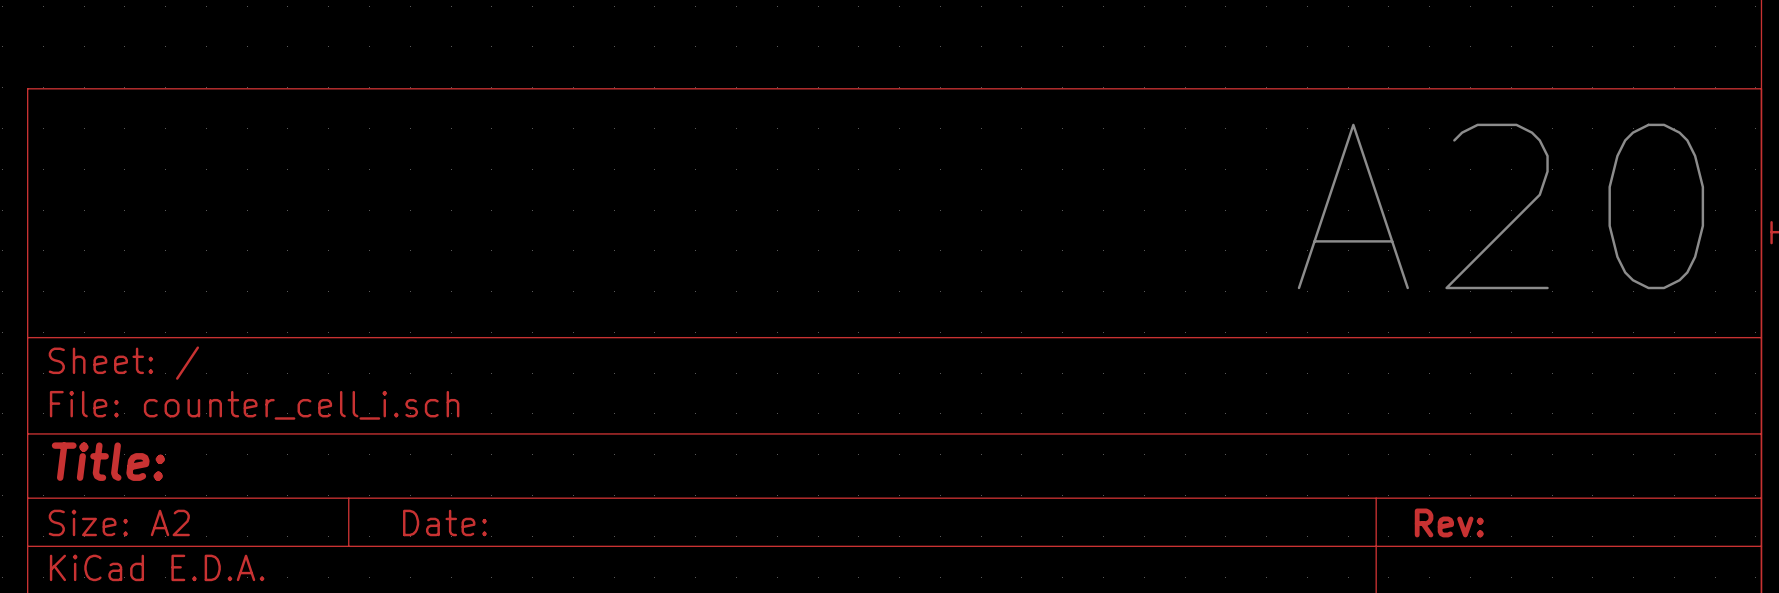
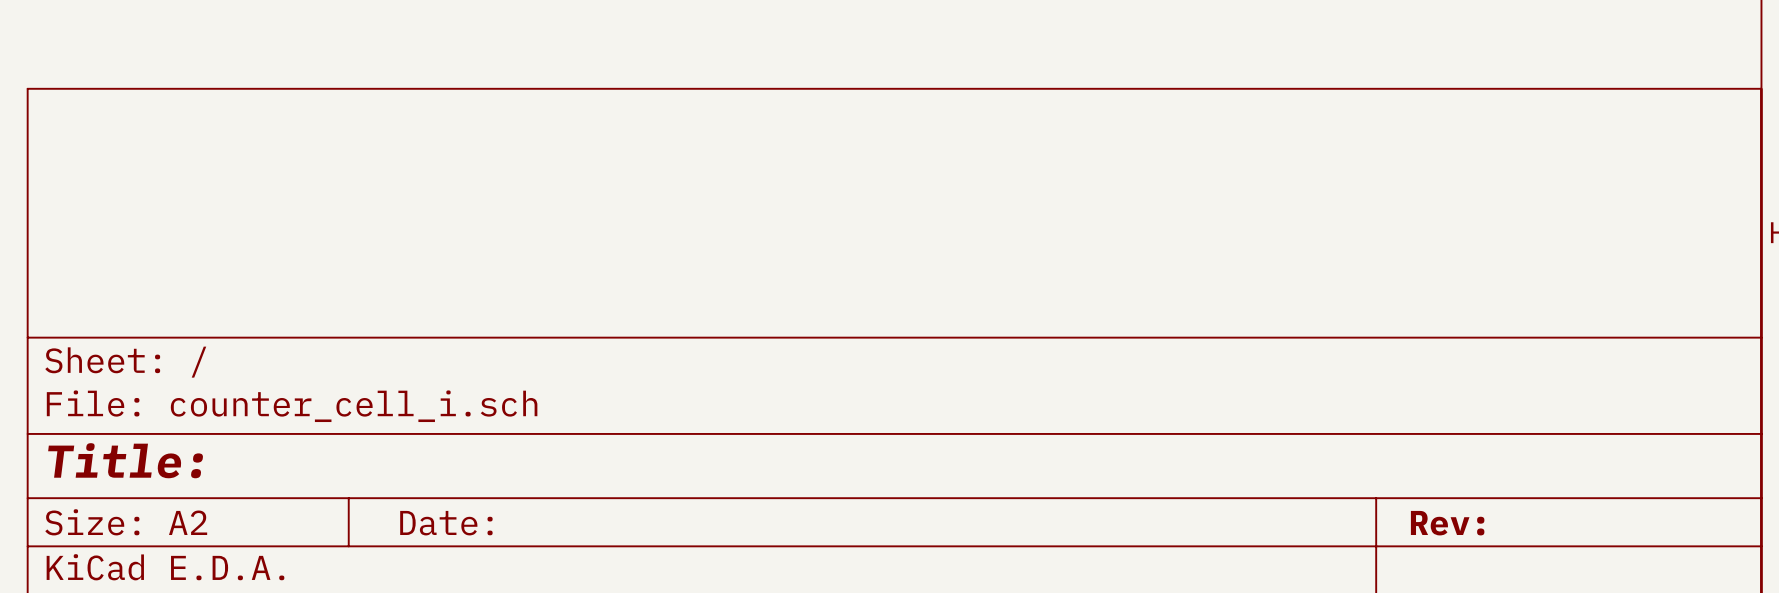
text: A20 (1500, 206) -> none

